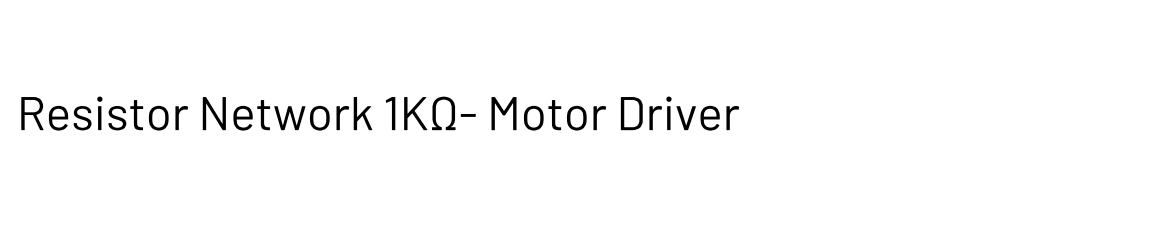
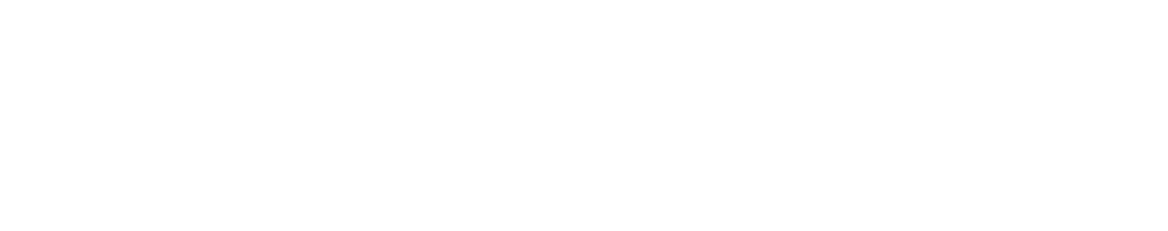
text: Resistor Network 1KΩ- Motor Driver (380, 113) -> none

